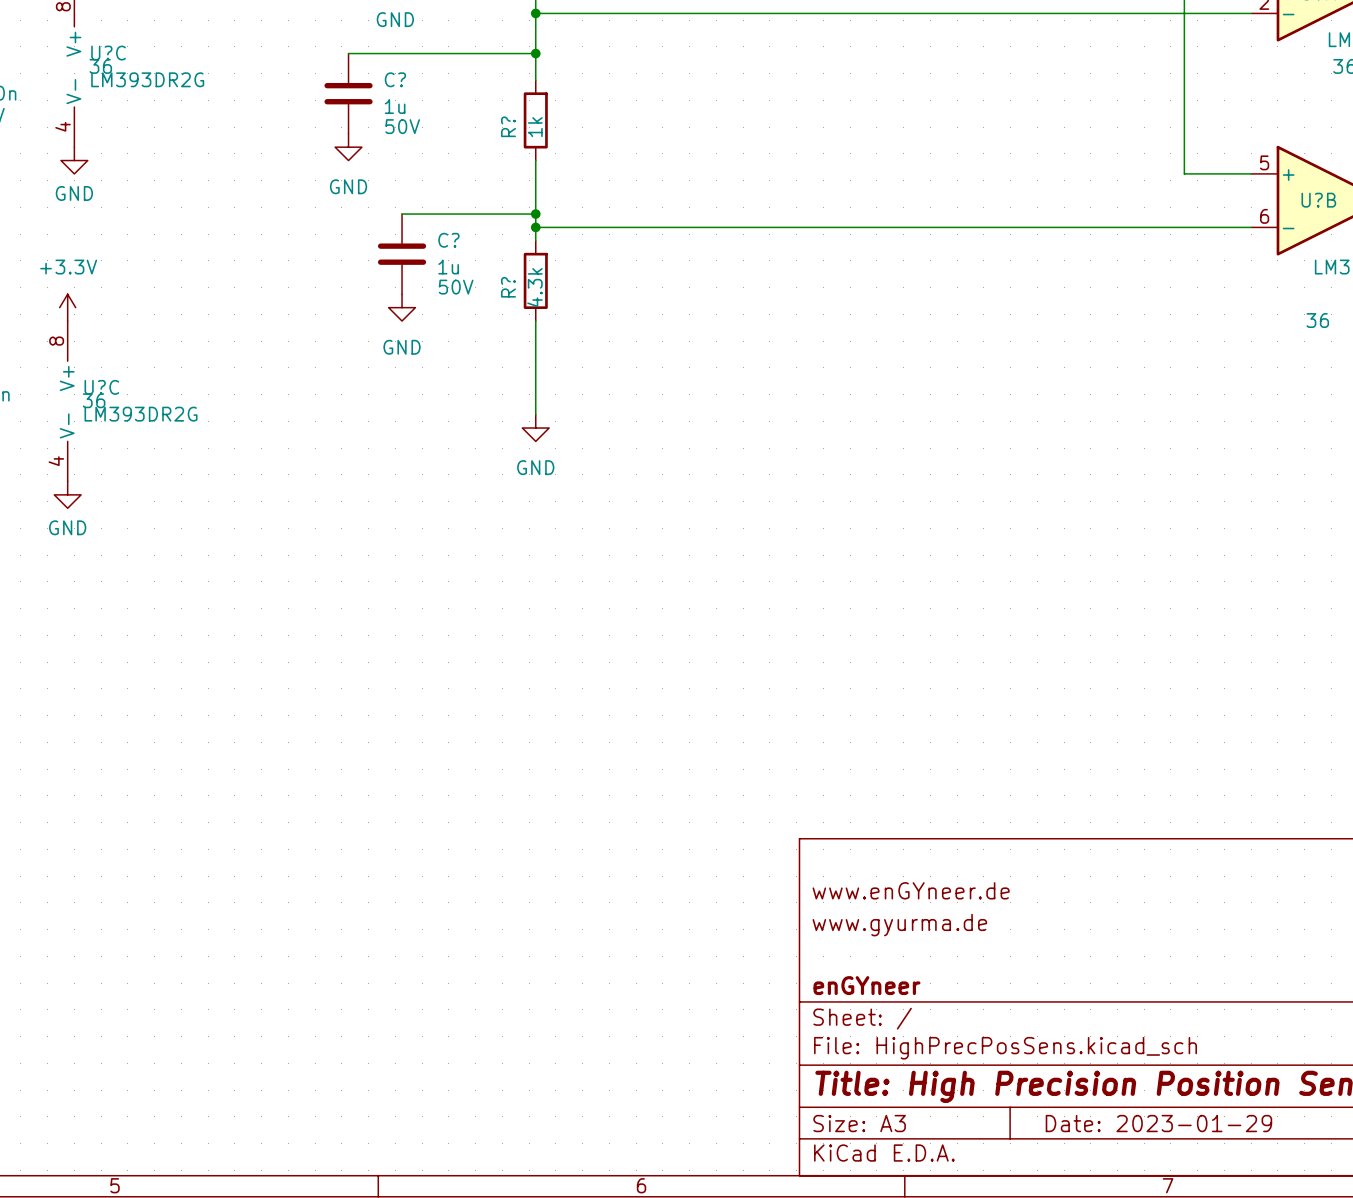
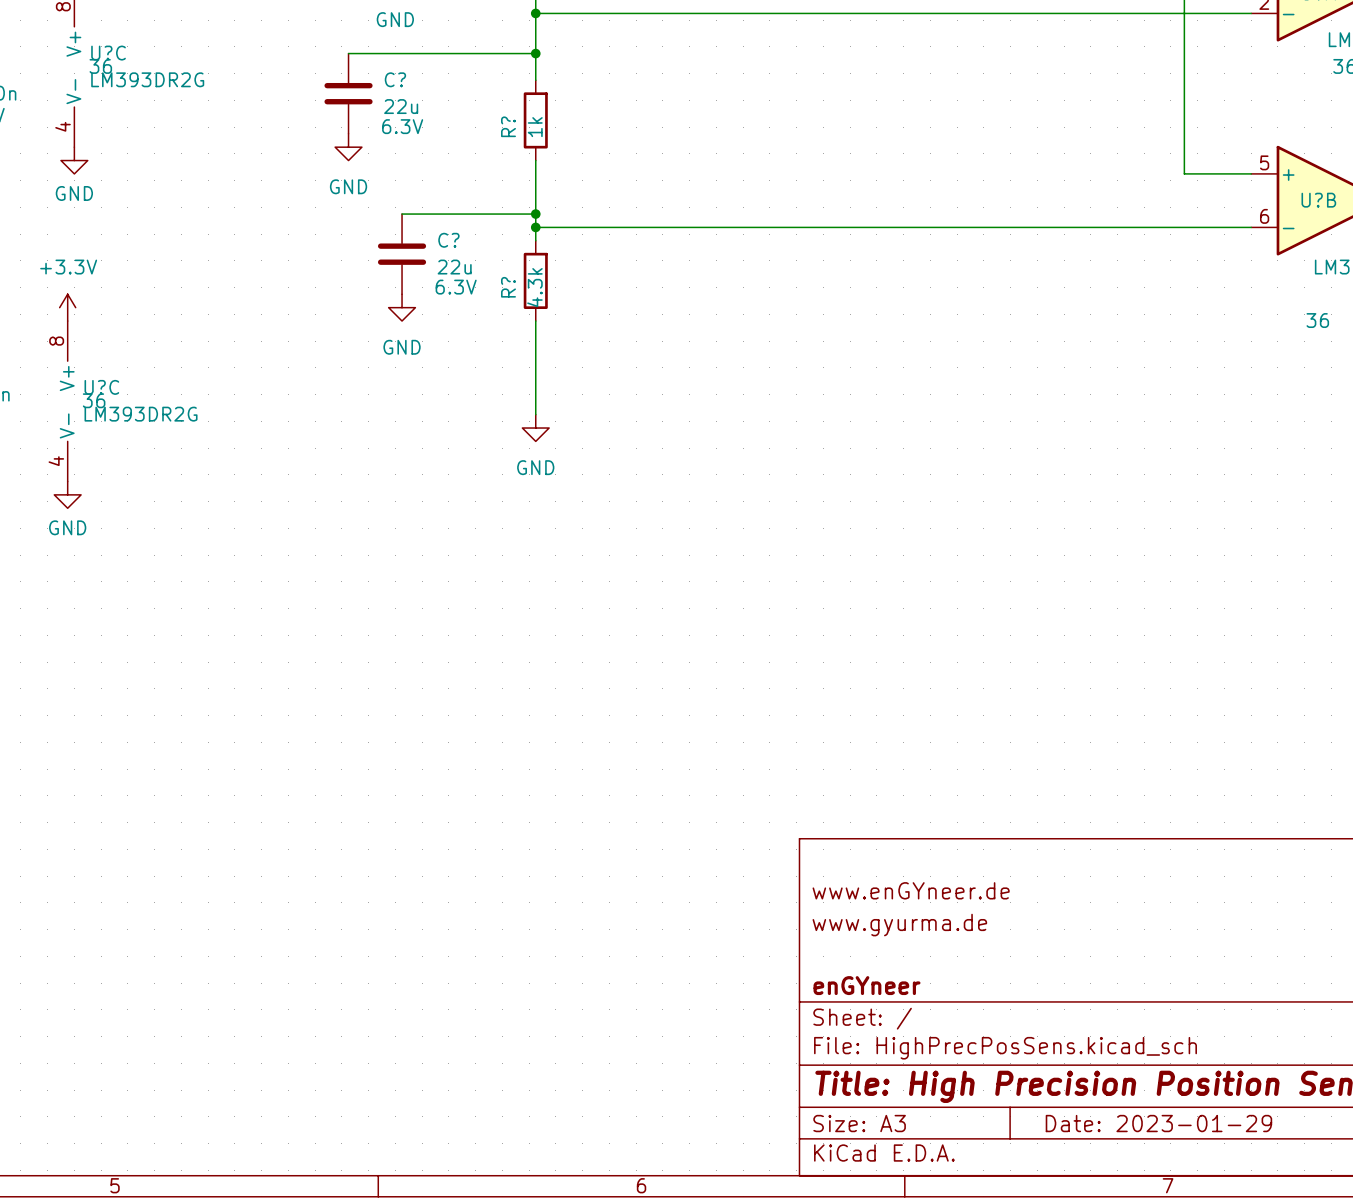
C? value: 1u (395, 106) -> 22u (401, 106)
C? text: 50V (402, 126) -> 6.3V (402, 126)
C? value: 1u (448, 267) -> 22u (454, 267)
C? text: 50V (456, 287) -> 6.3V (456, 287)

